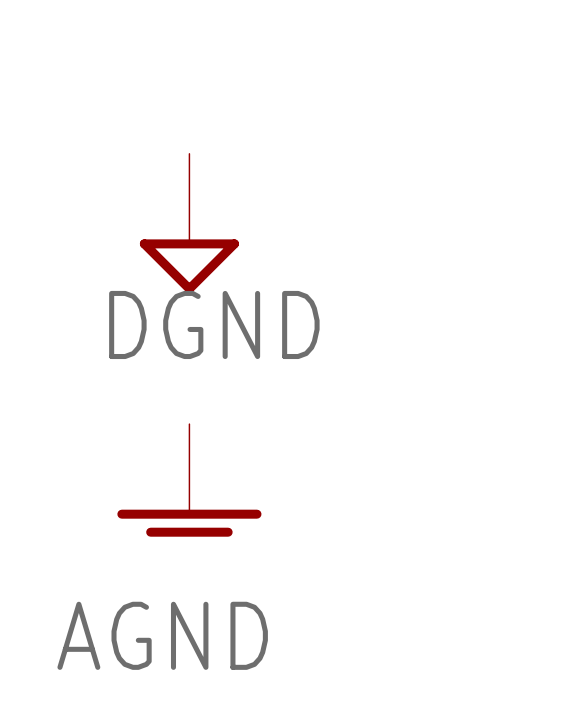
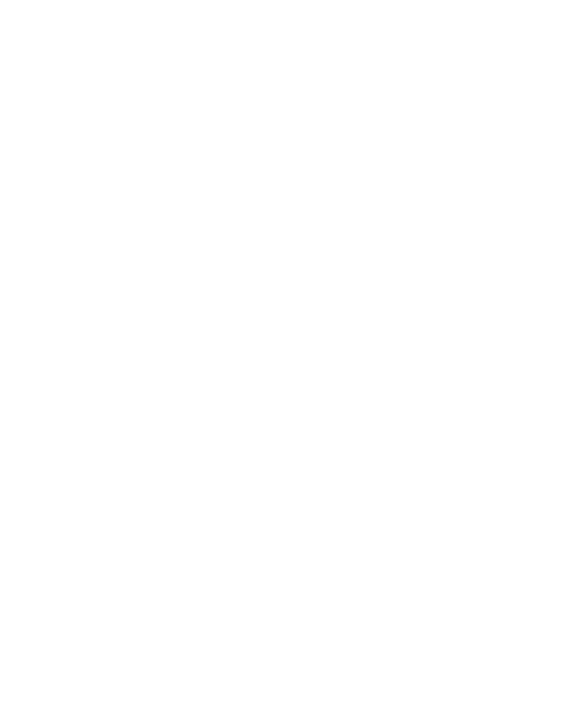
power symbol: DGND (189, 223) -> none
power symbol: AGND (189, 480) -> none

